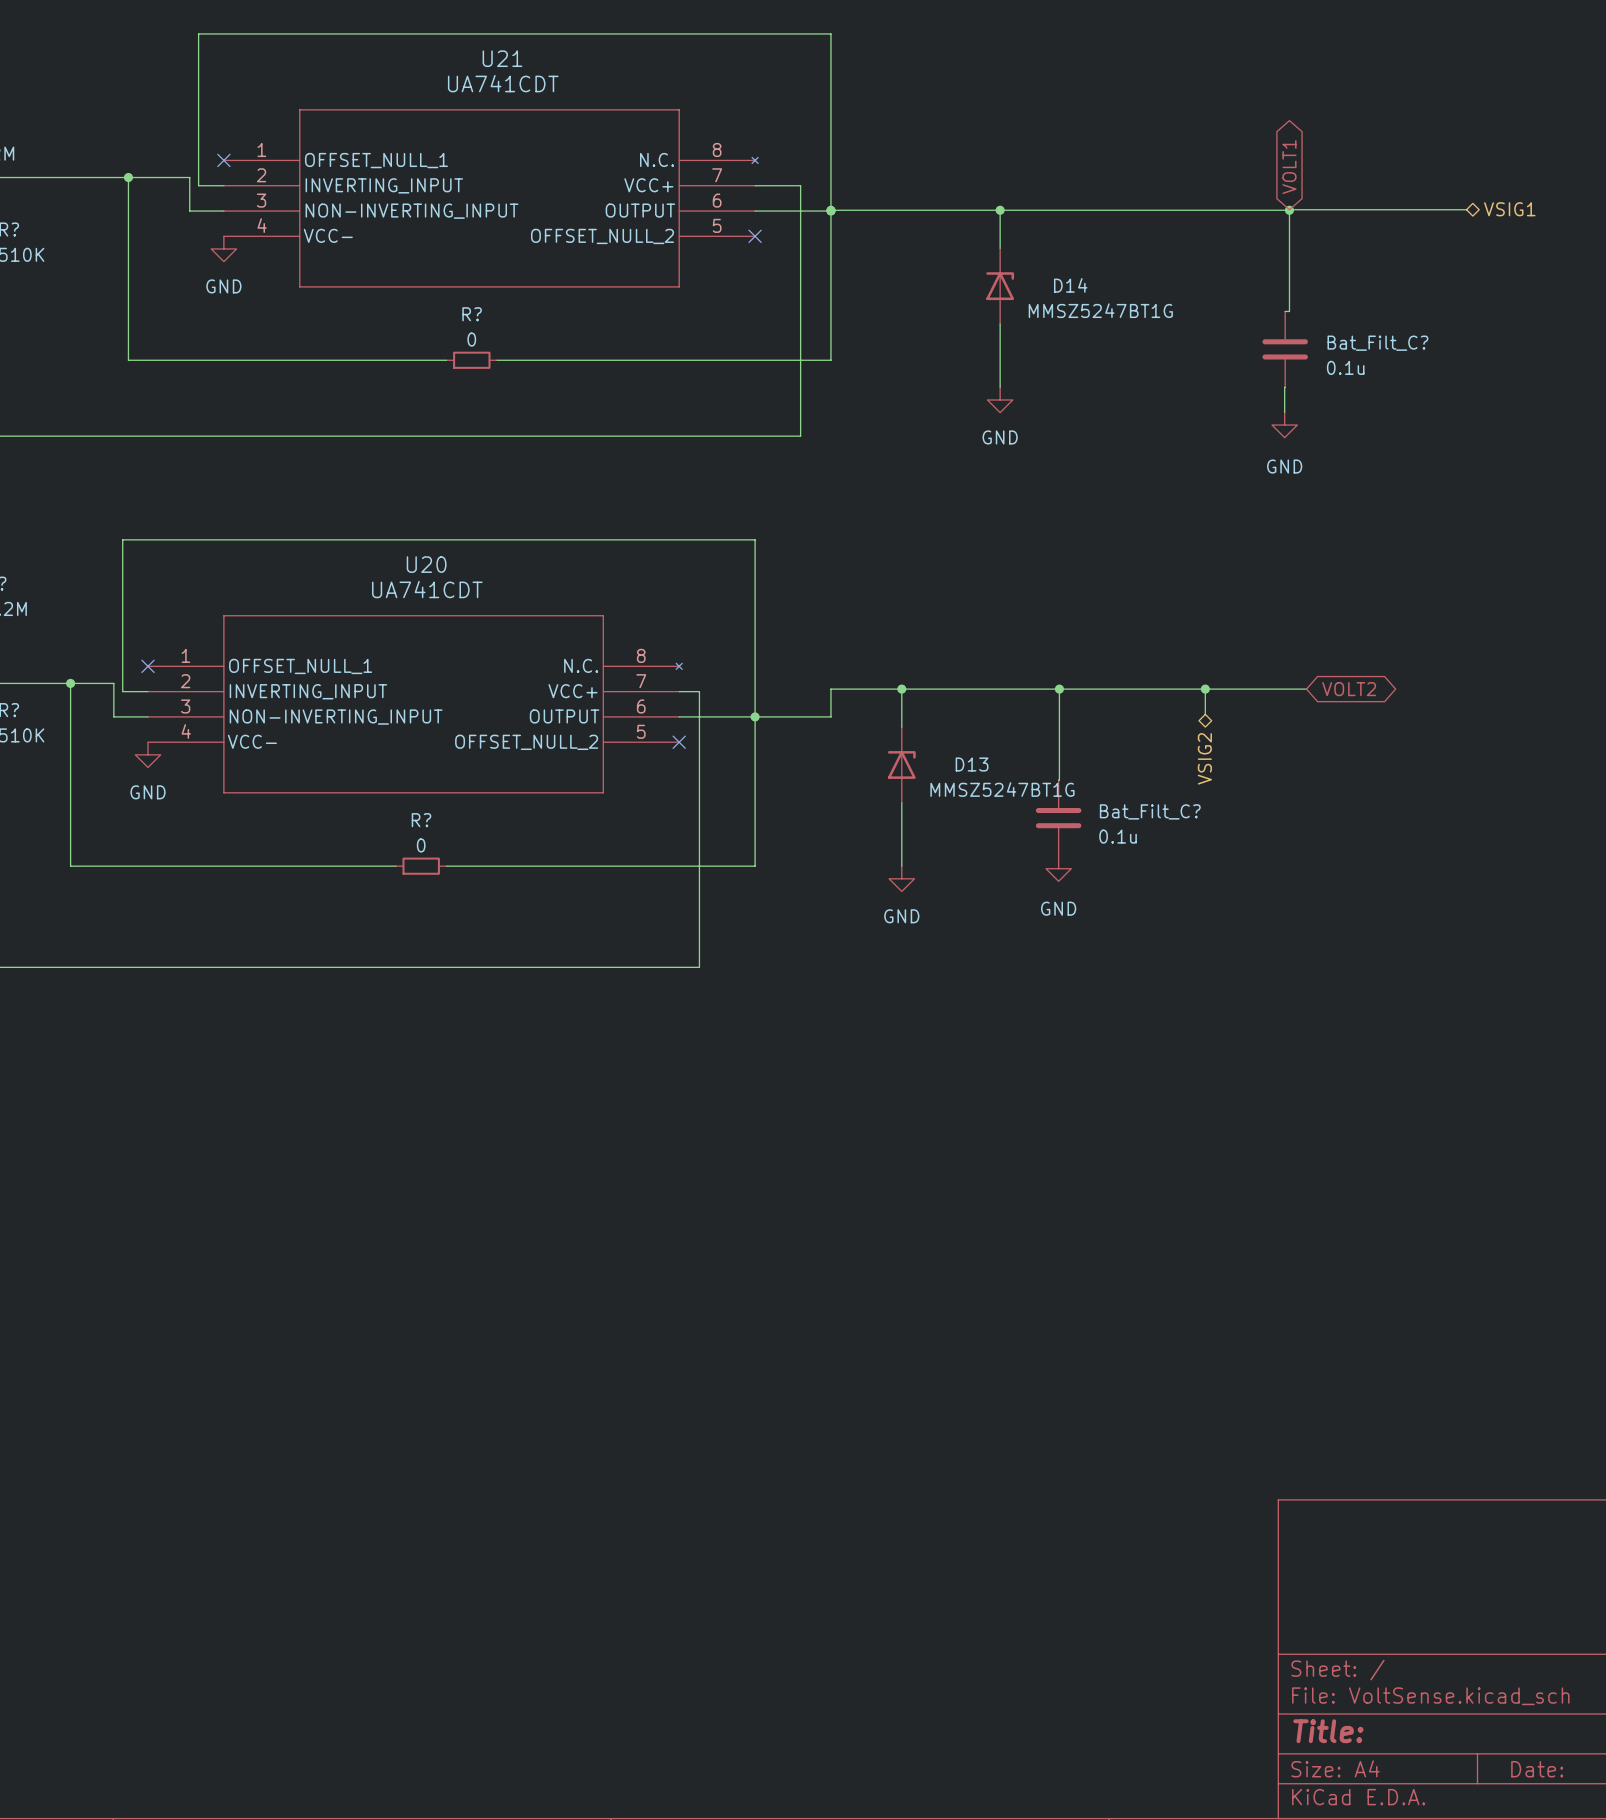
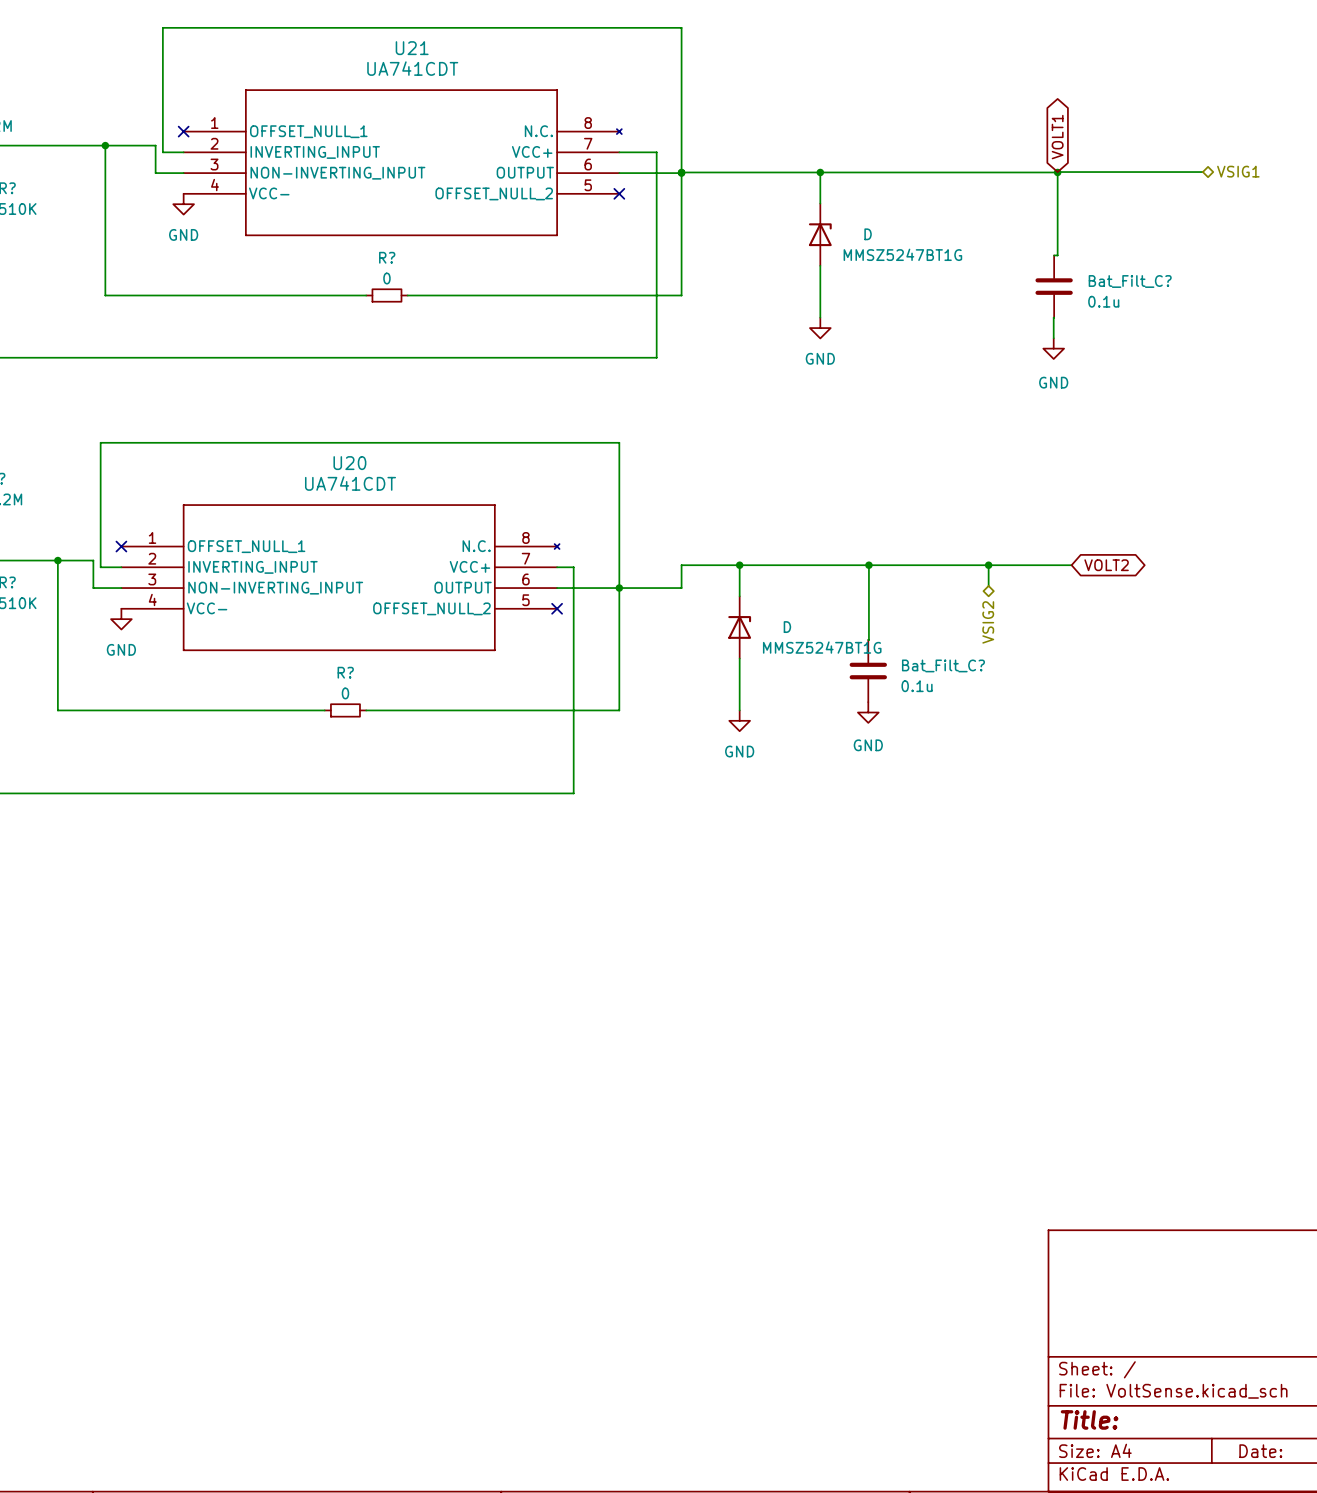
D14 name: D14 (1070, 285) -> D (868, 234)
D13 name: D13 (972, 764) -> D (787, 627)

